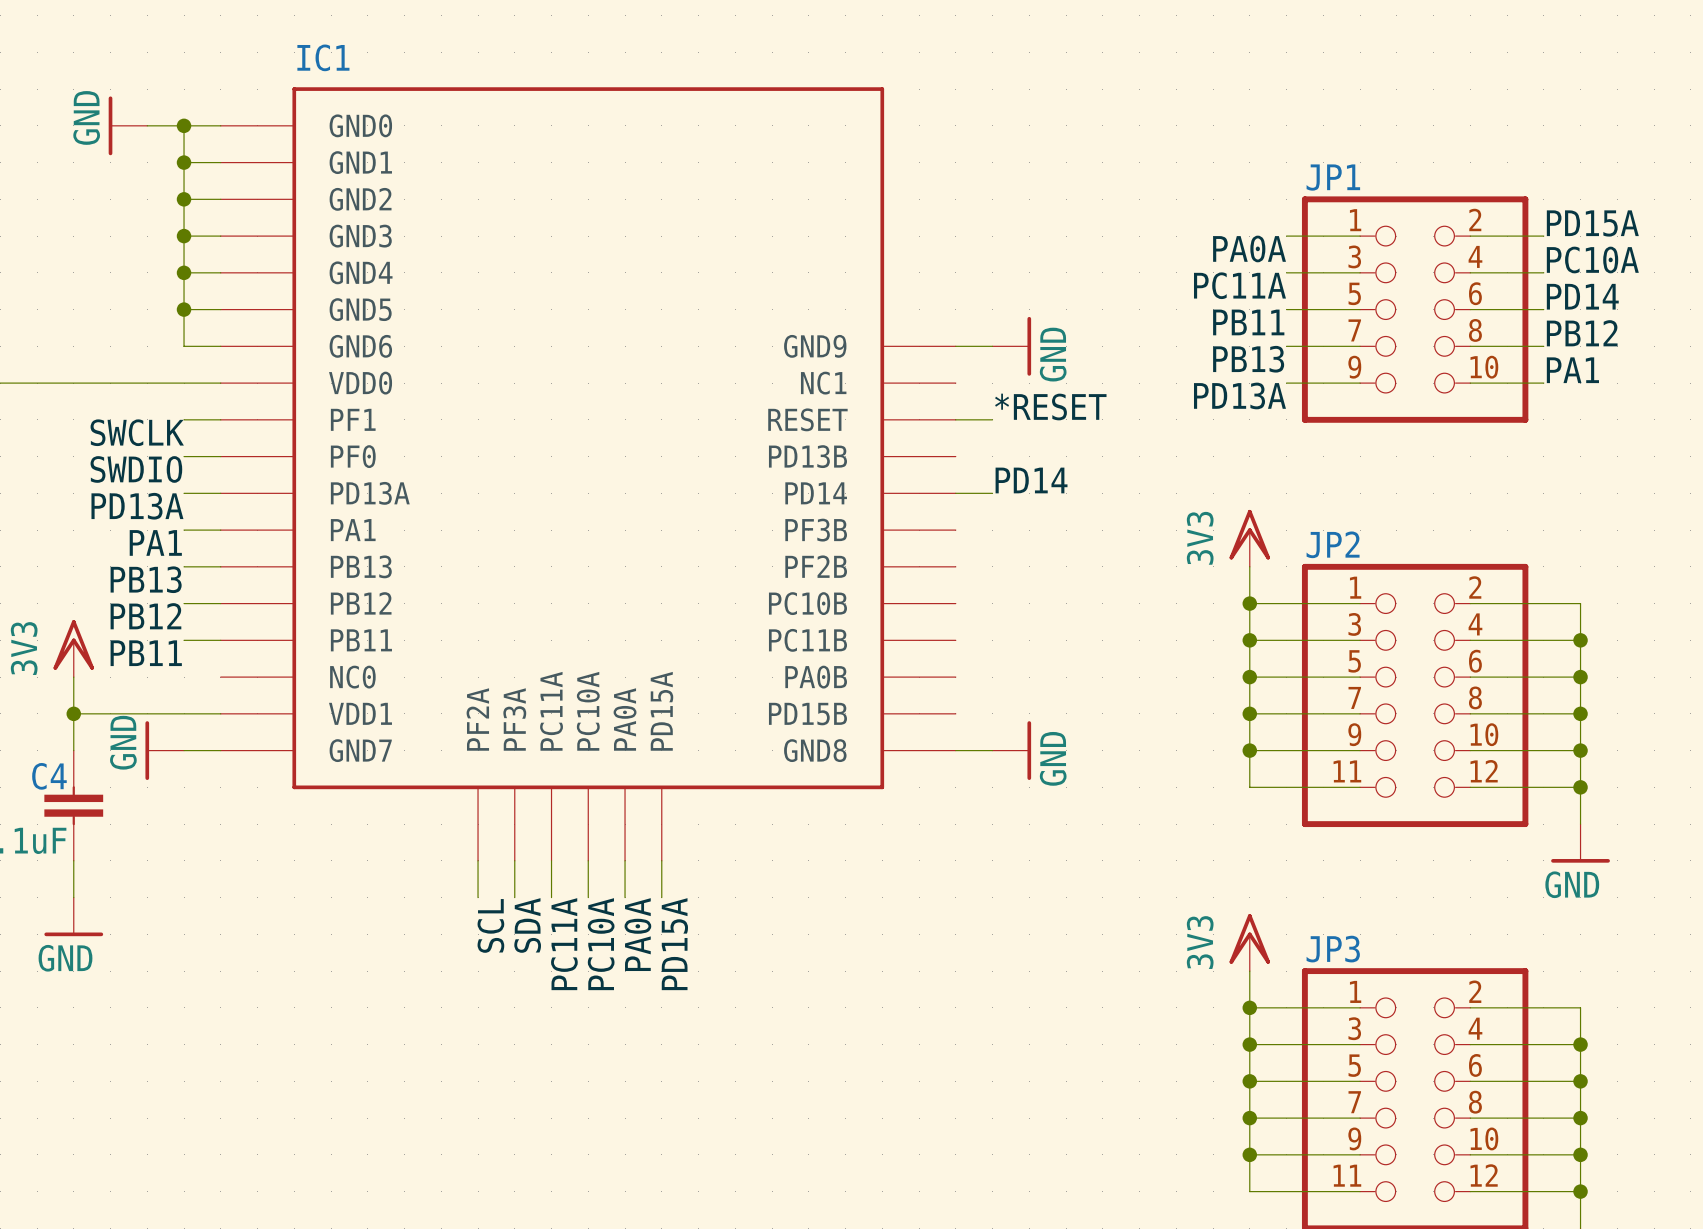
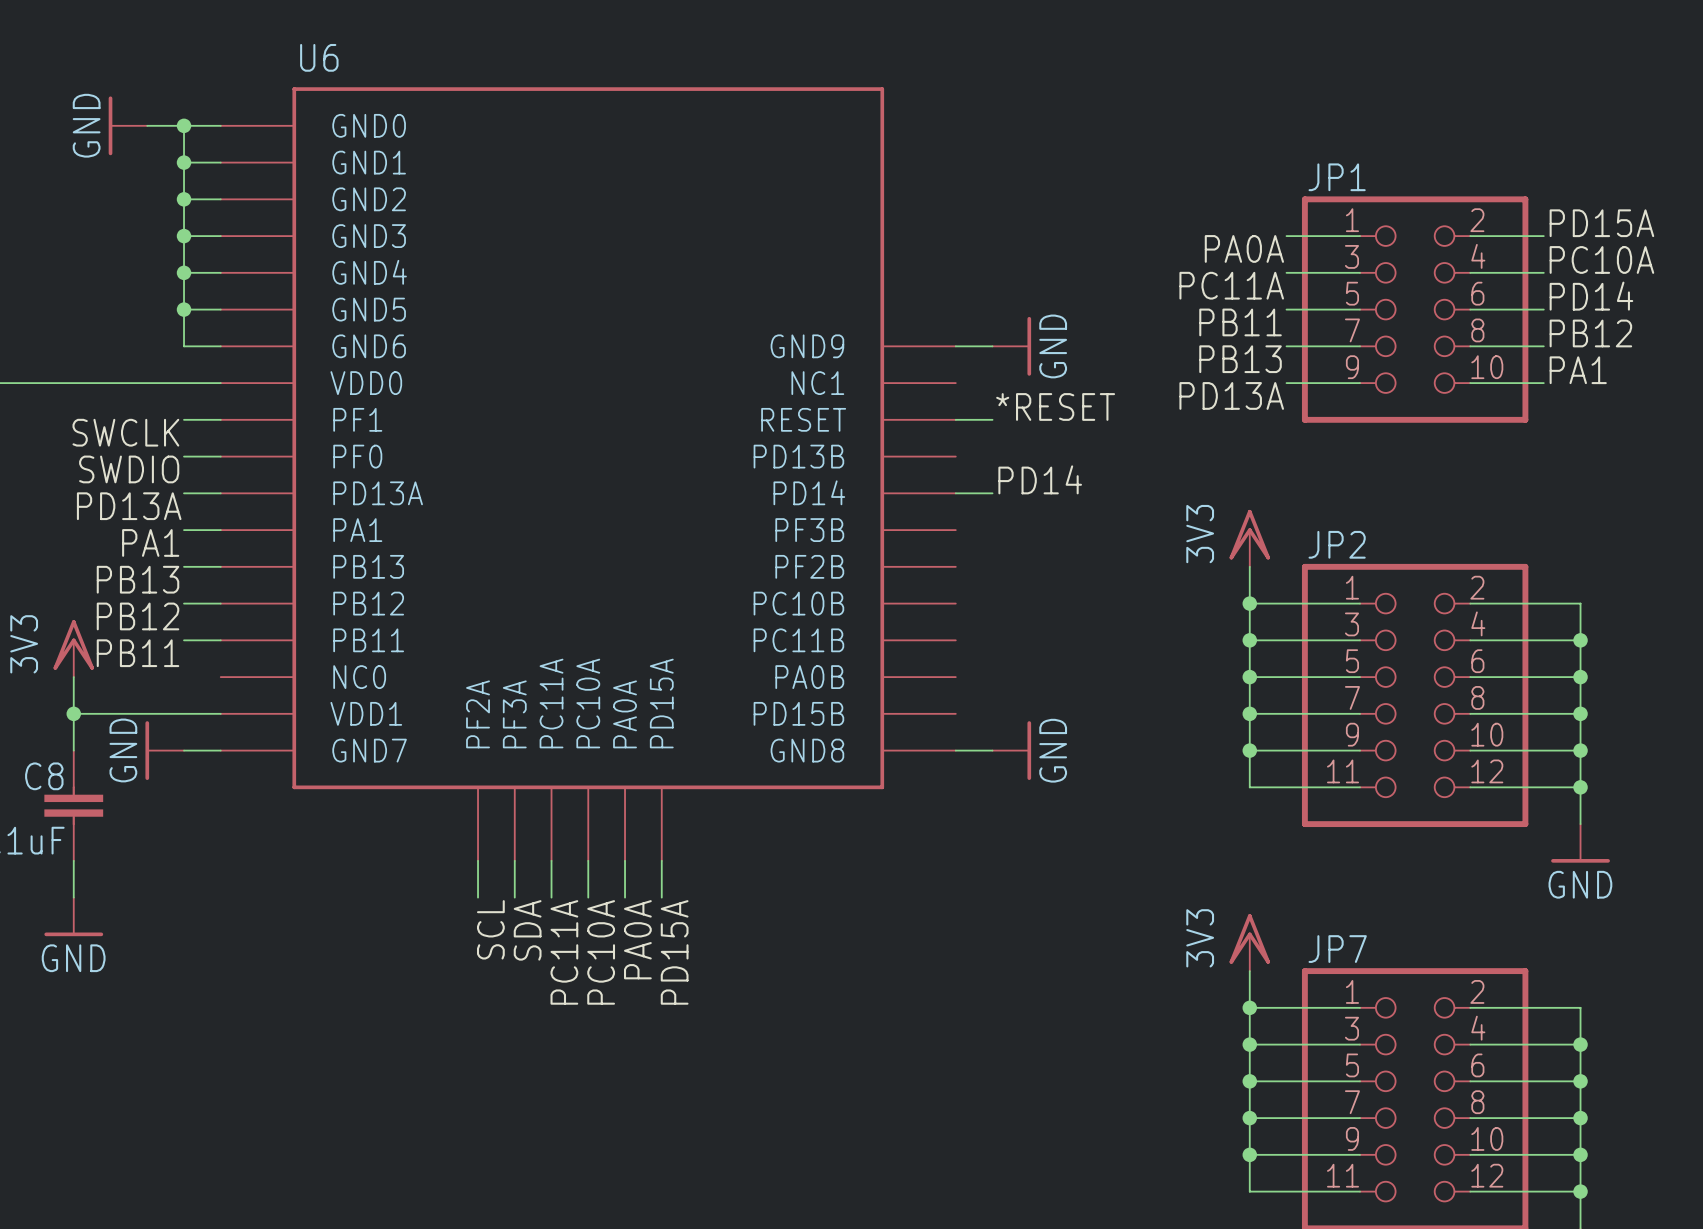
IC1 name: IC1 (323, 57) -> U6 (319, 57)
C4 name: C4 (49, 776) -> C8 (44, 776)
JP3 name: JP3 (1333, 949) -> JP7 (1337, 949)

